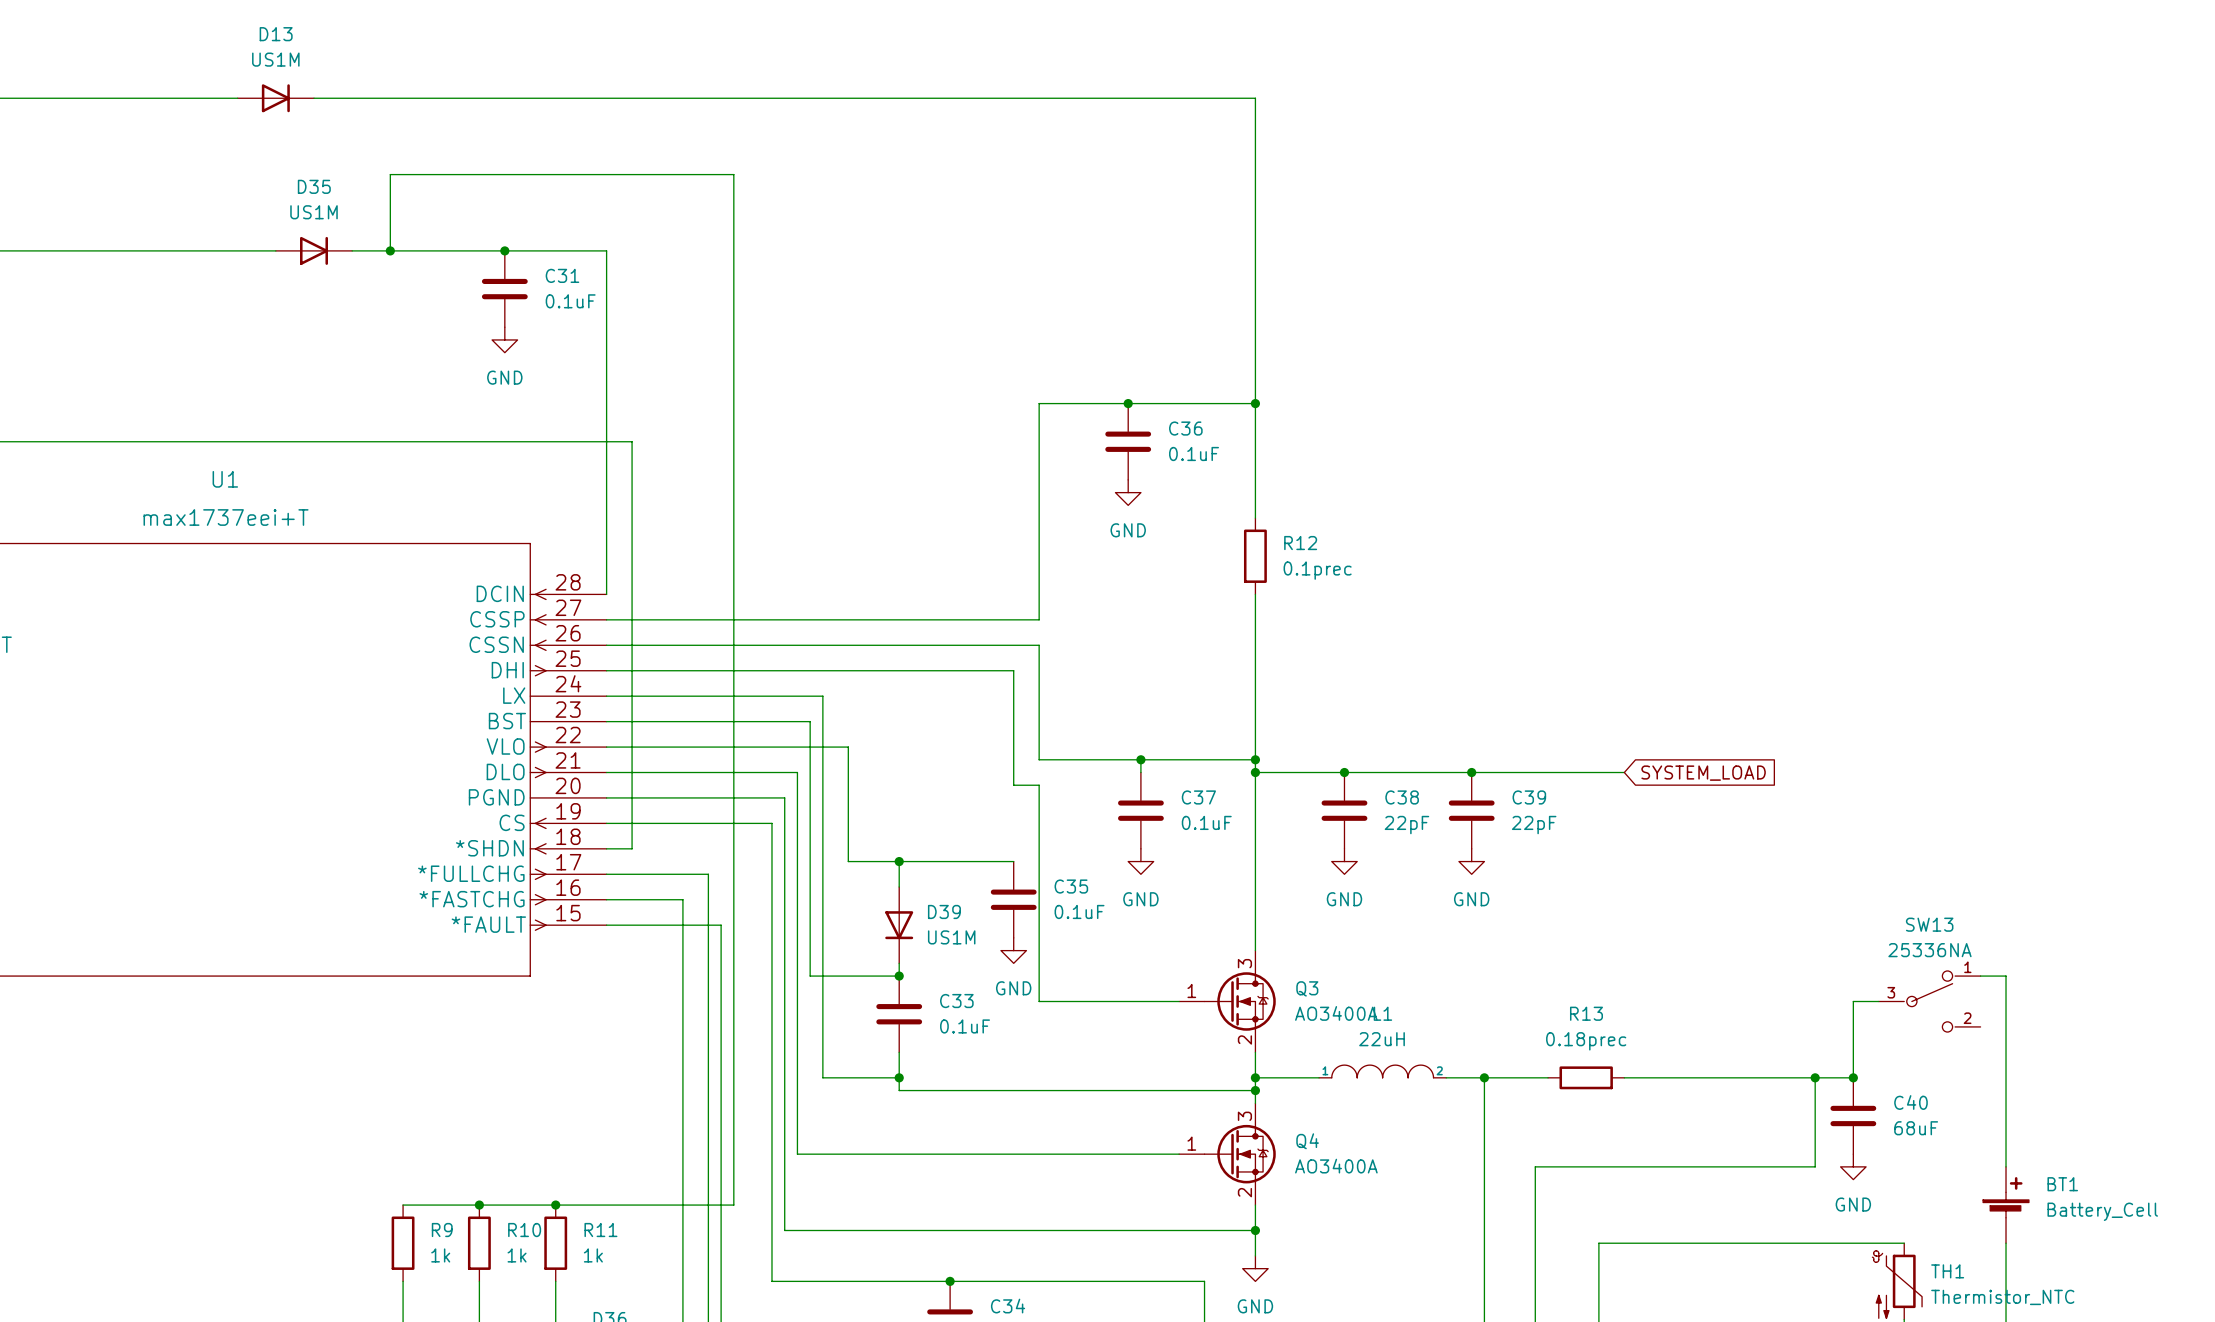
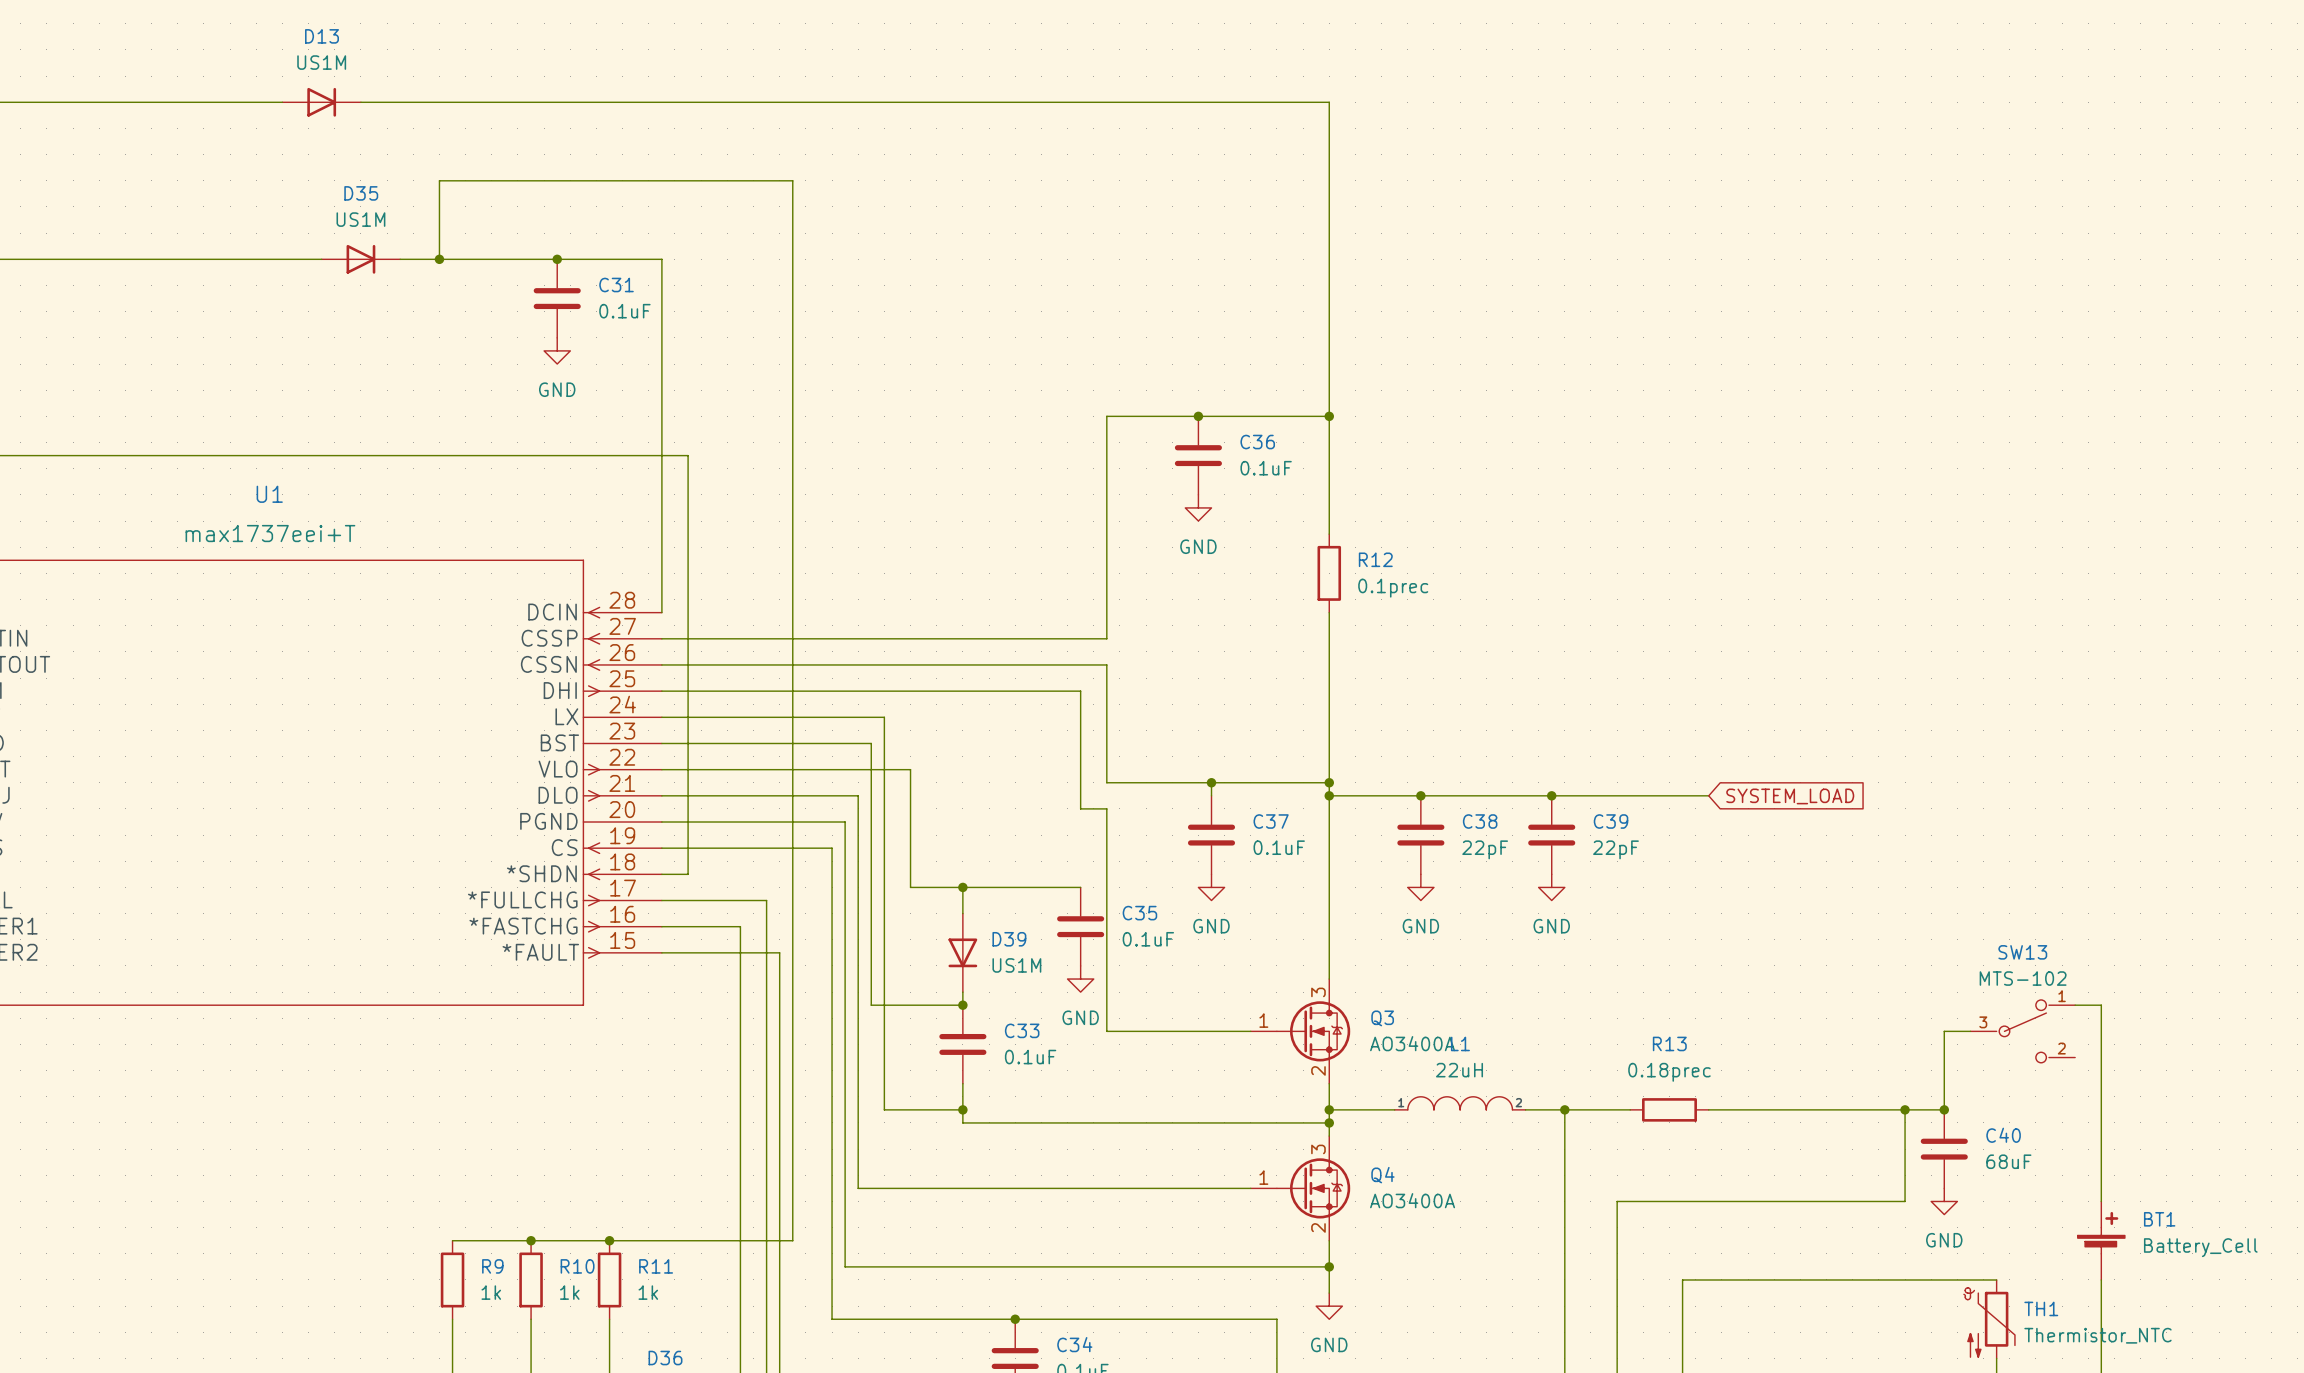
SW13 value: 25336NA (1929, 950) -> MTS-102 (2023, 978)

